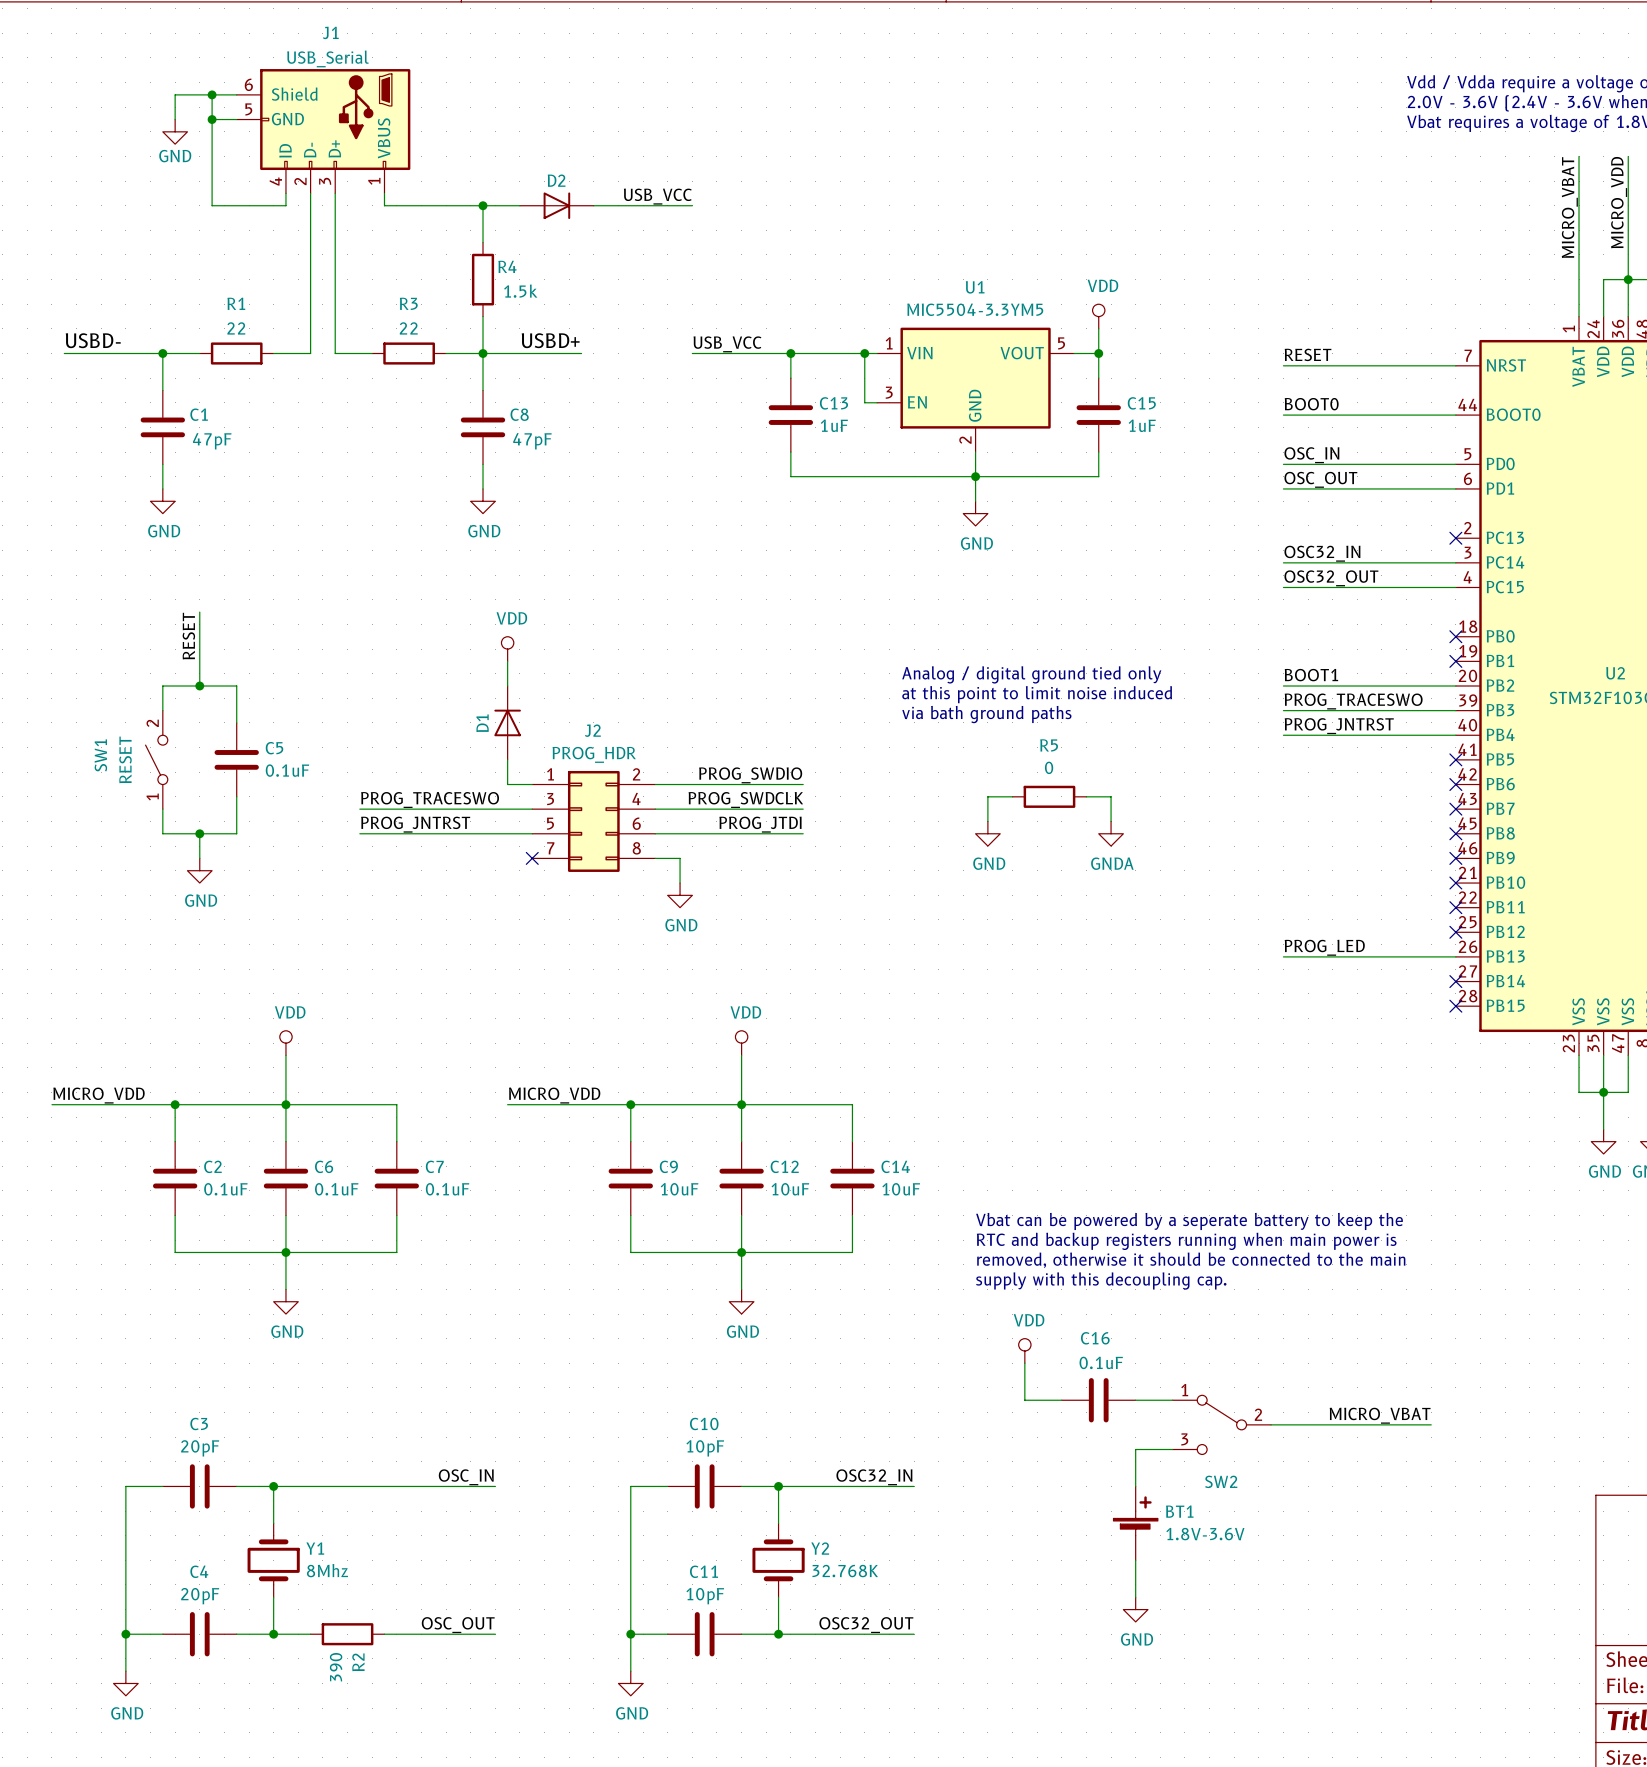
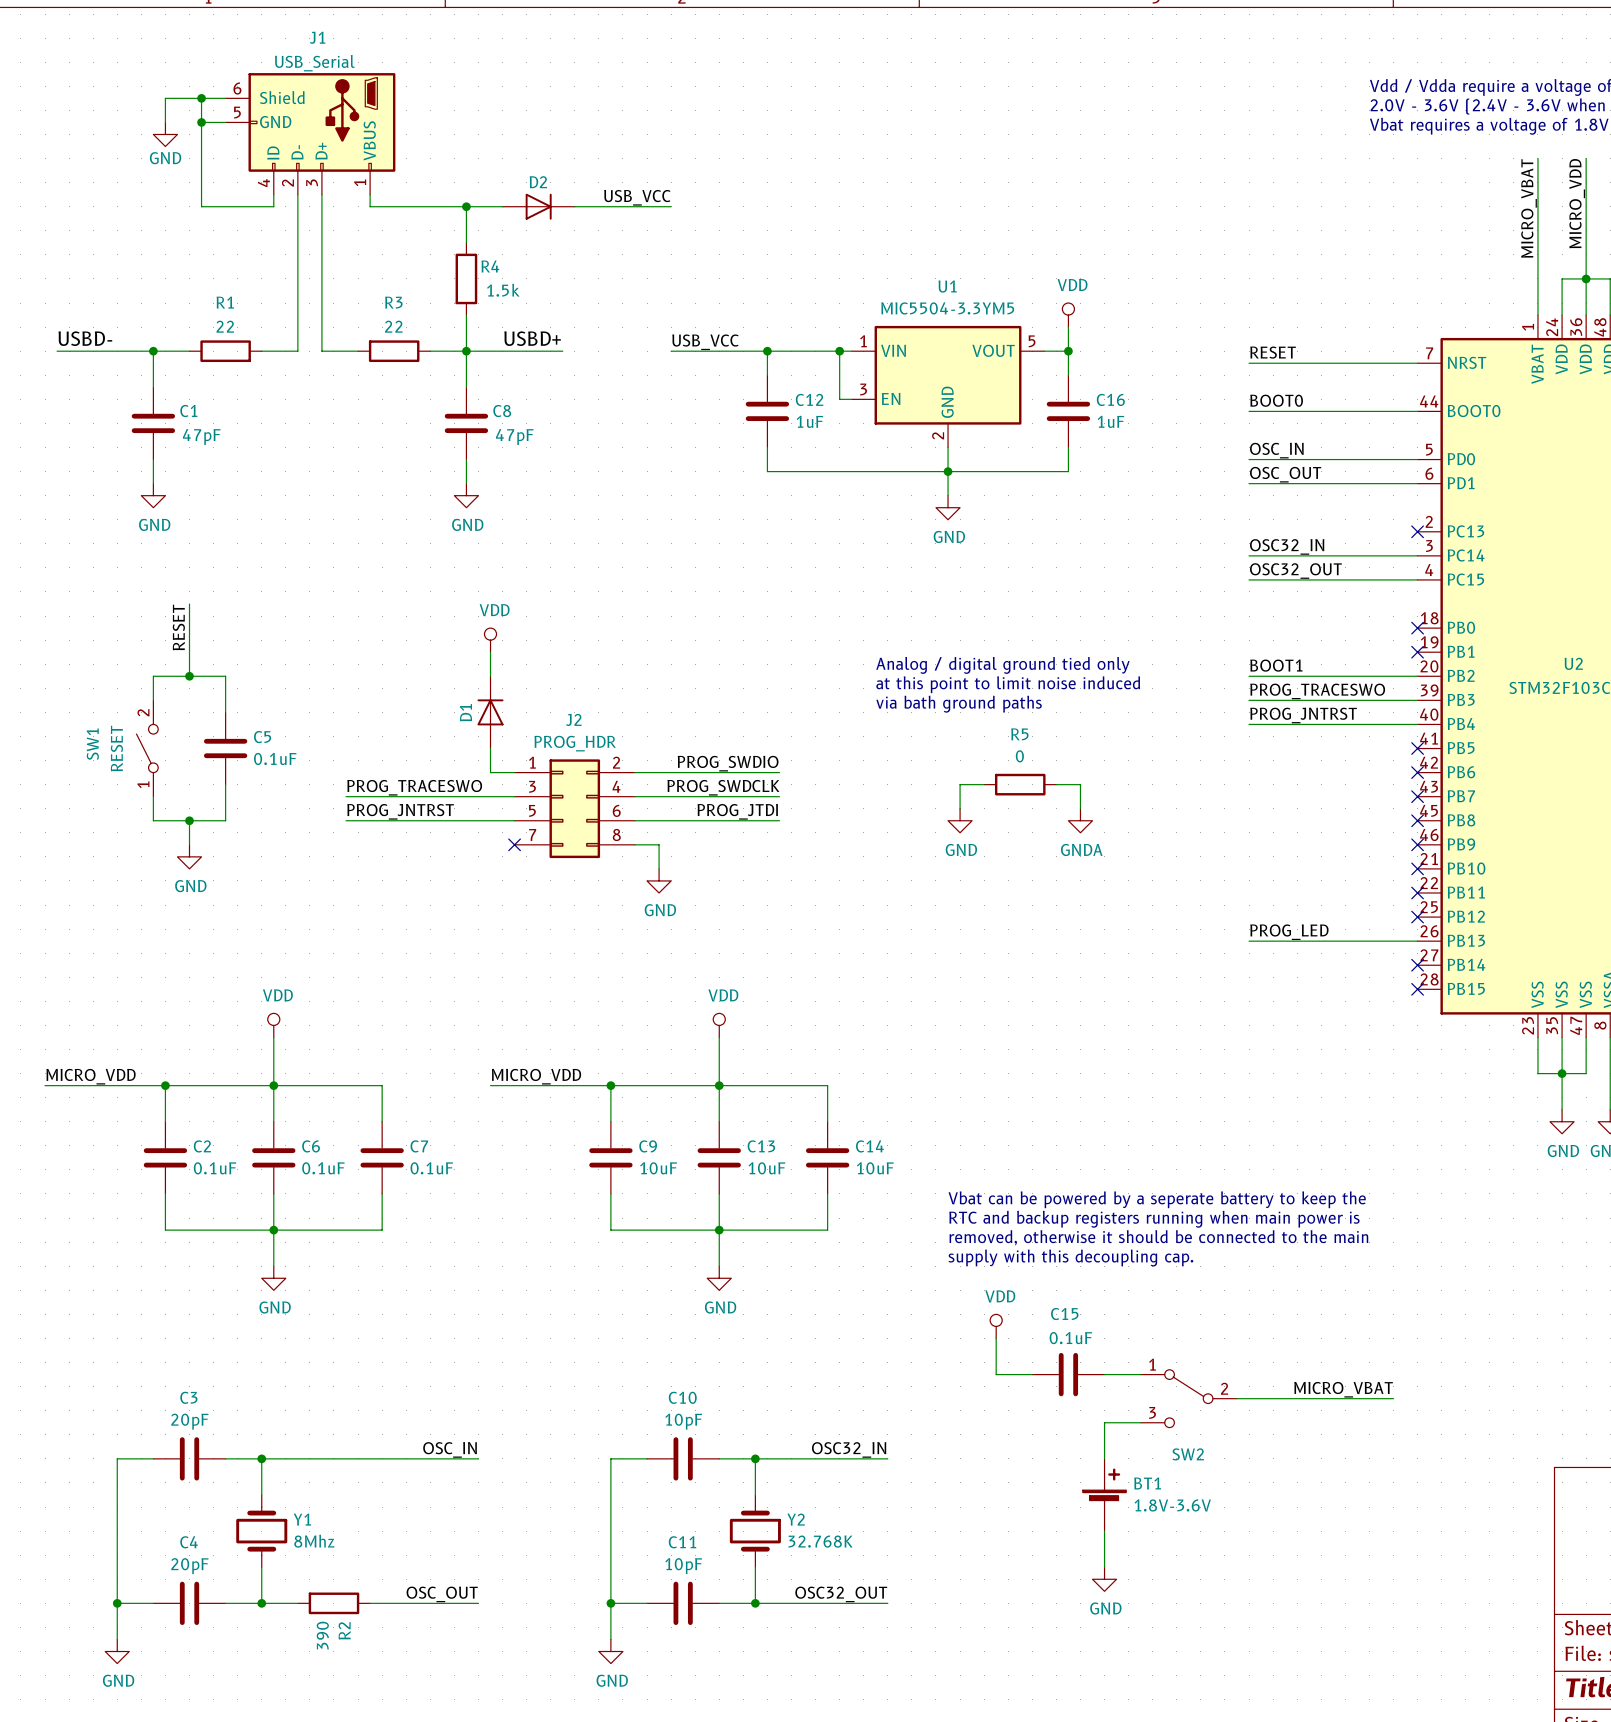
C13 name: C13 (833, 403) -> C12 (809, 399)
C15 name: C15 (1141, 403) -> C16 (1110, 399)
C12 name: C12 (784, 1166) -> C13 (761, 1146)
C16 name: C16 (1095, 1338) -> C15 (1064, 1314)

